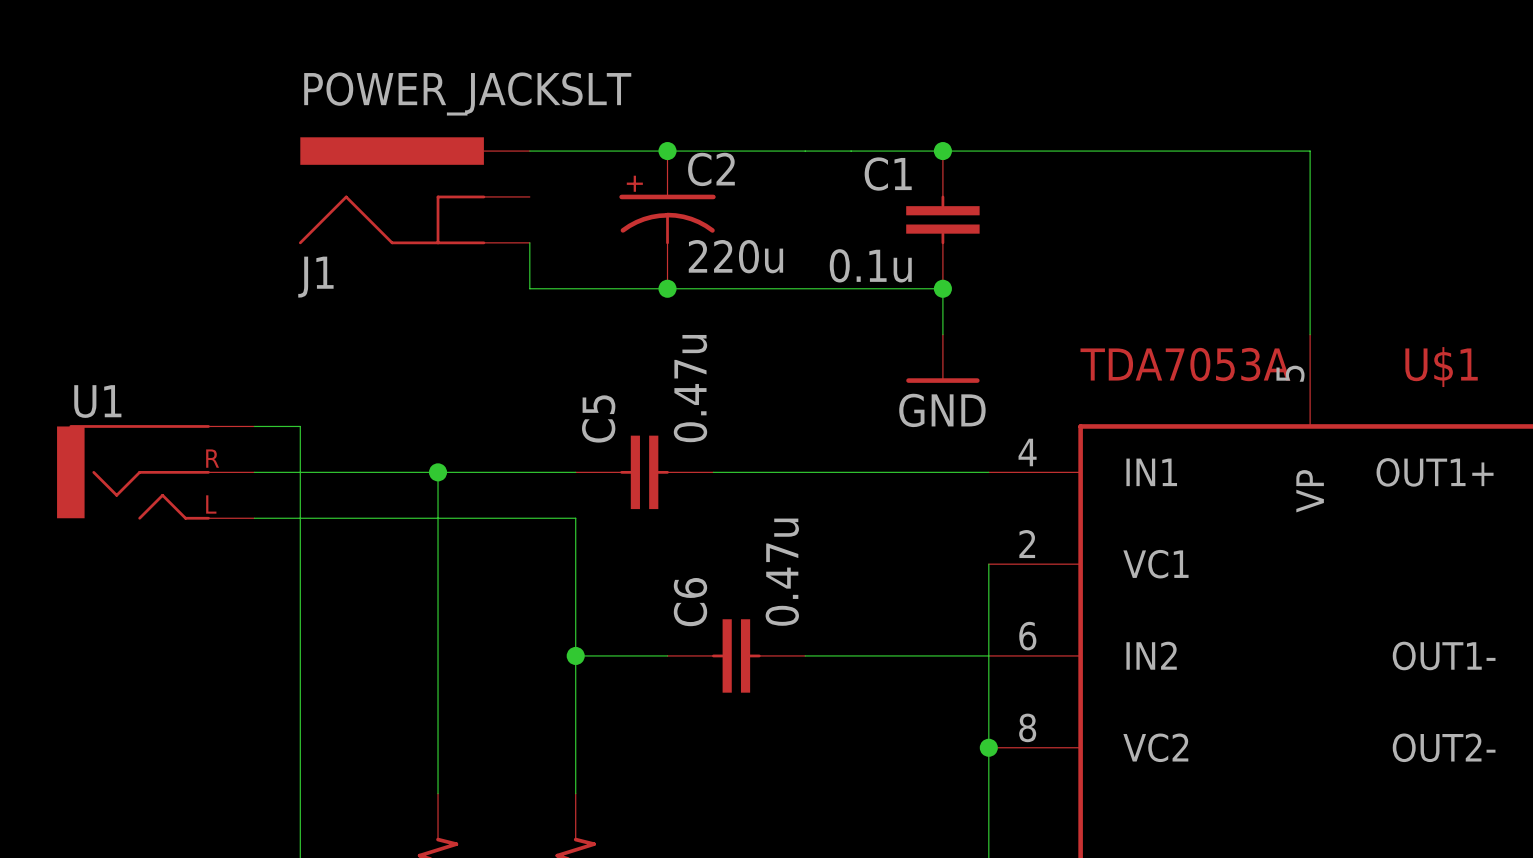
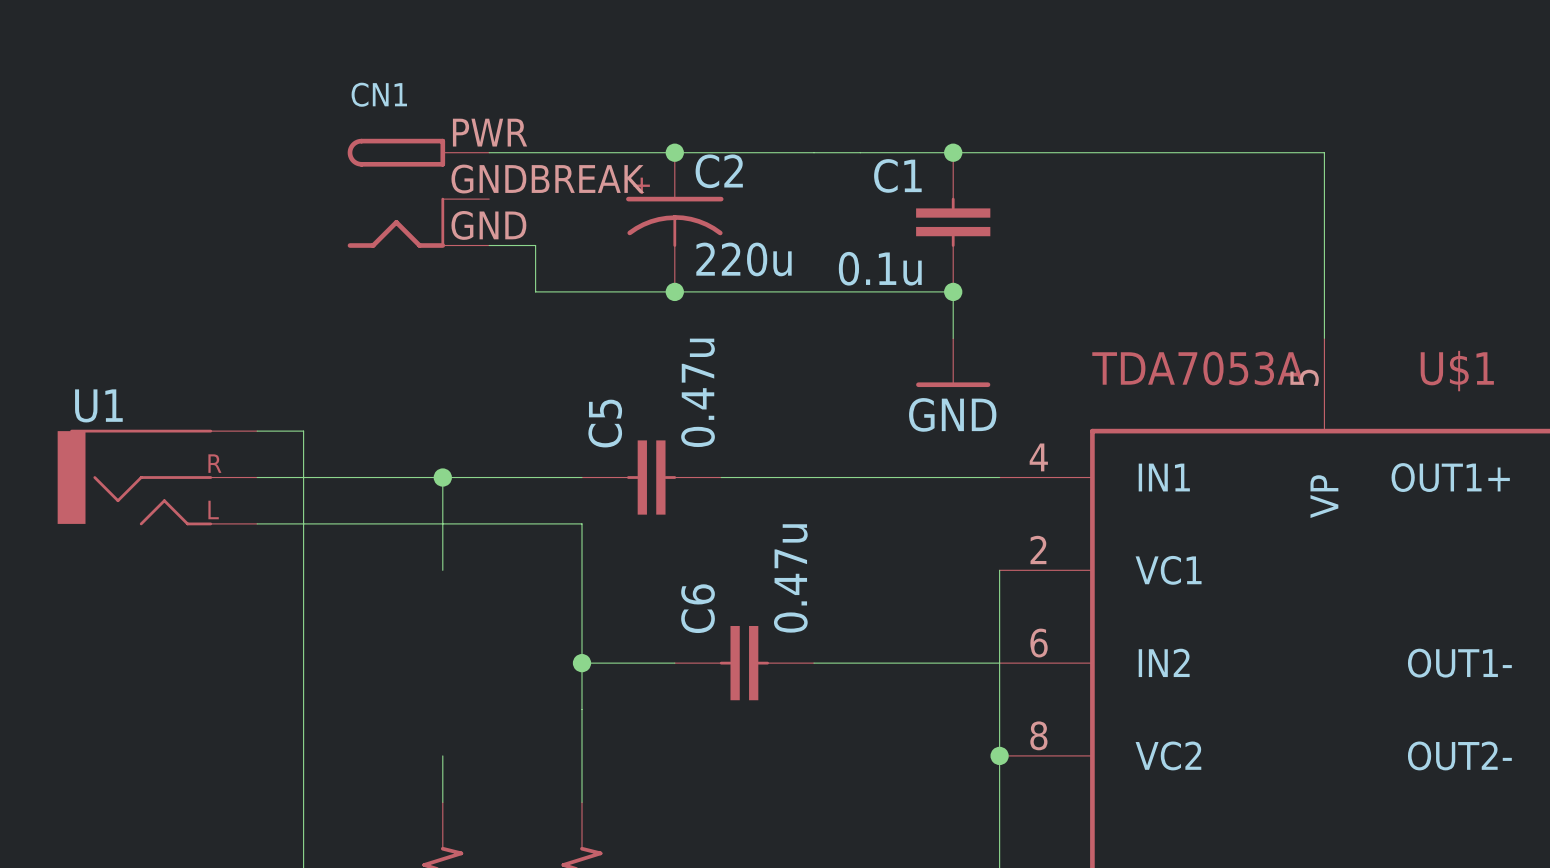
J1: POWER_JACKSLT (414, 190) -> none
CN1: none -> (418, 193)
wire: (438, 564) (438, 747) -> none

